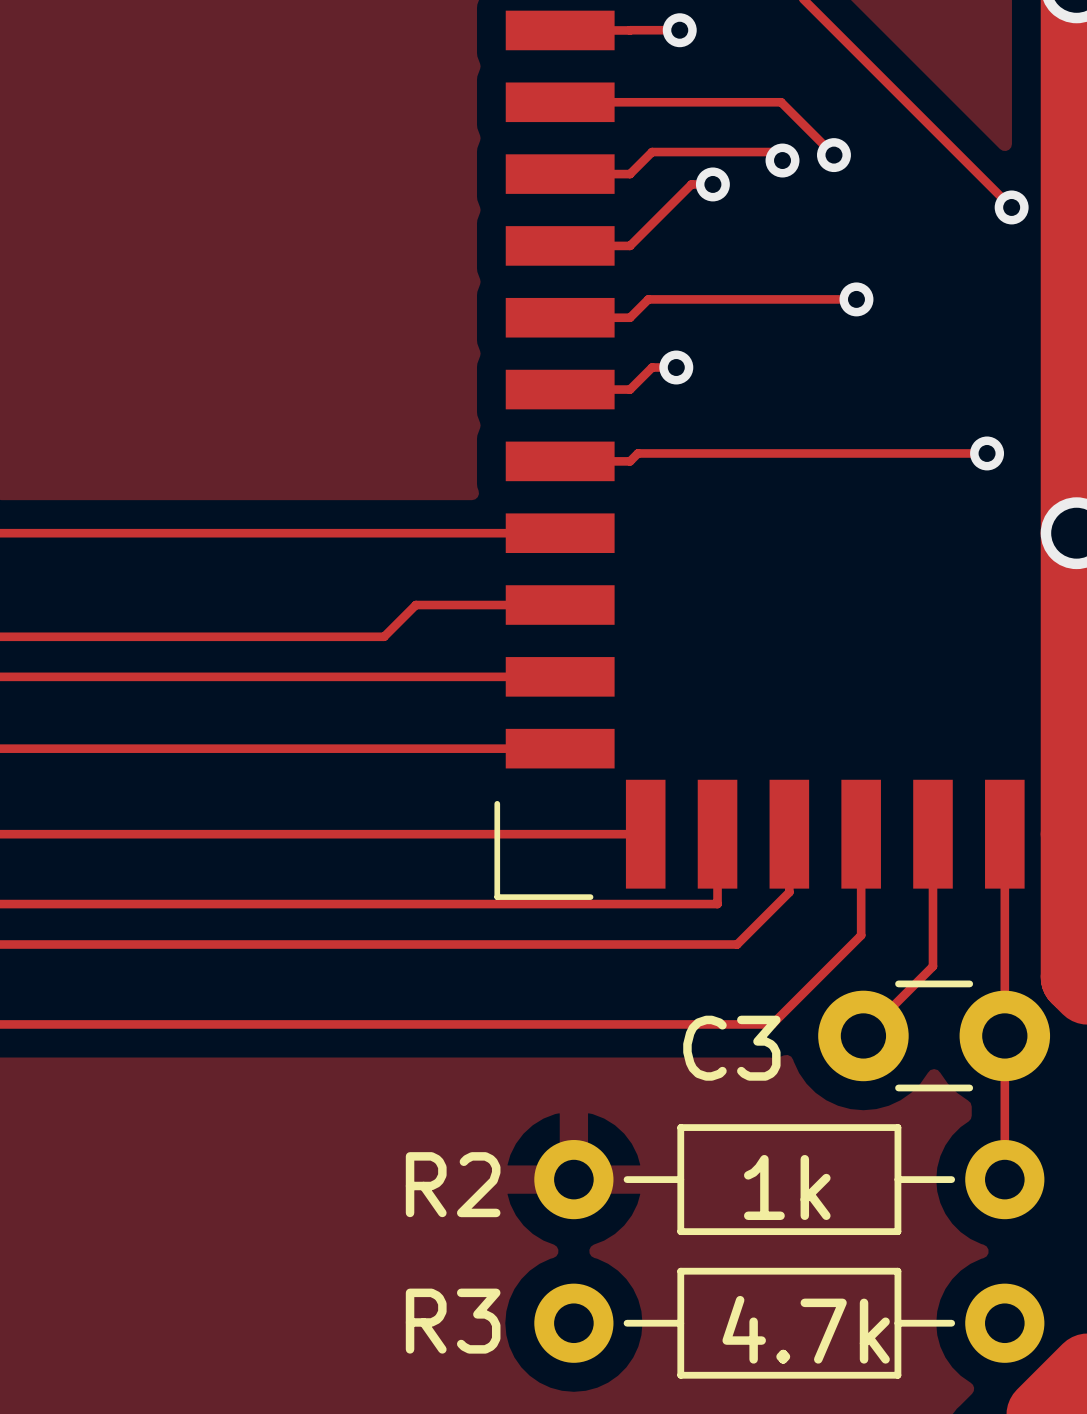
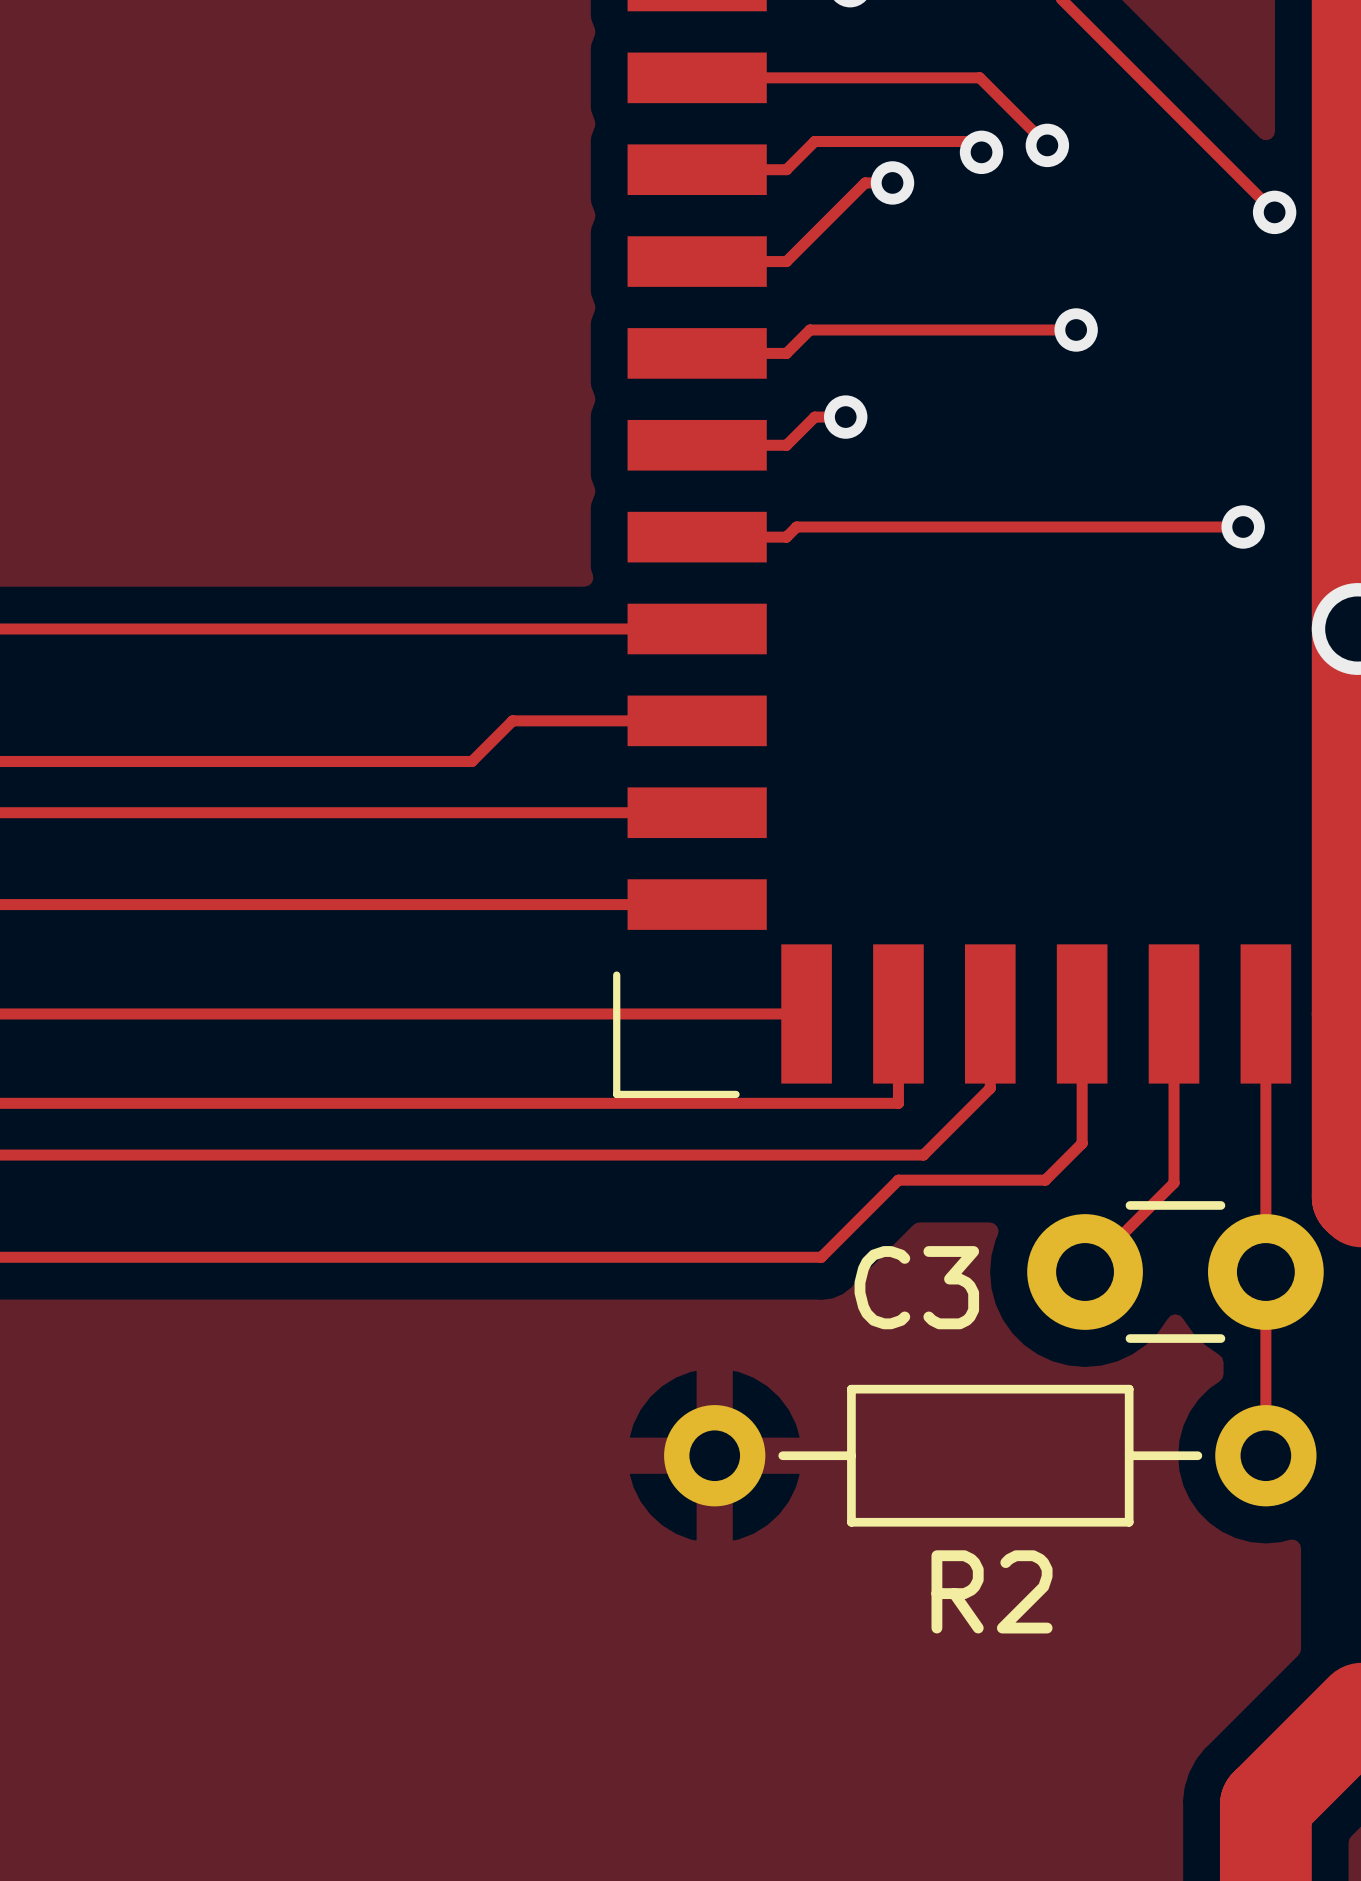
track: (832, 964) (772, 1024) (657, 1024) -> (1045, 1180) (898, 1180) (821, 1257)
R2 name position: R2 (453, 1184) -> R2 (992, 1591)
text: 1k (787, 1187) -> none
R3: (789, 1323) -> none
text: 4.7k (806, 1329) -> none

